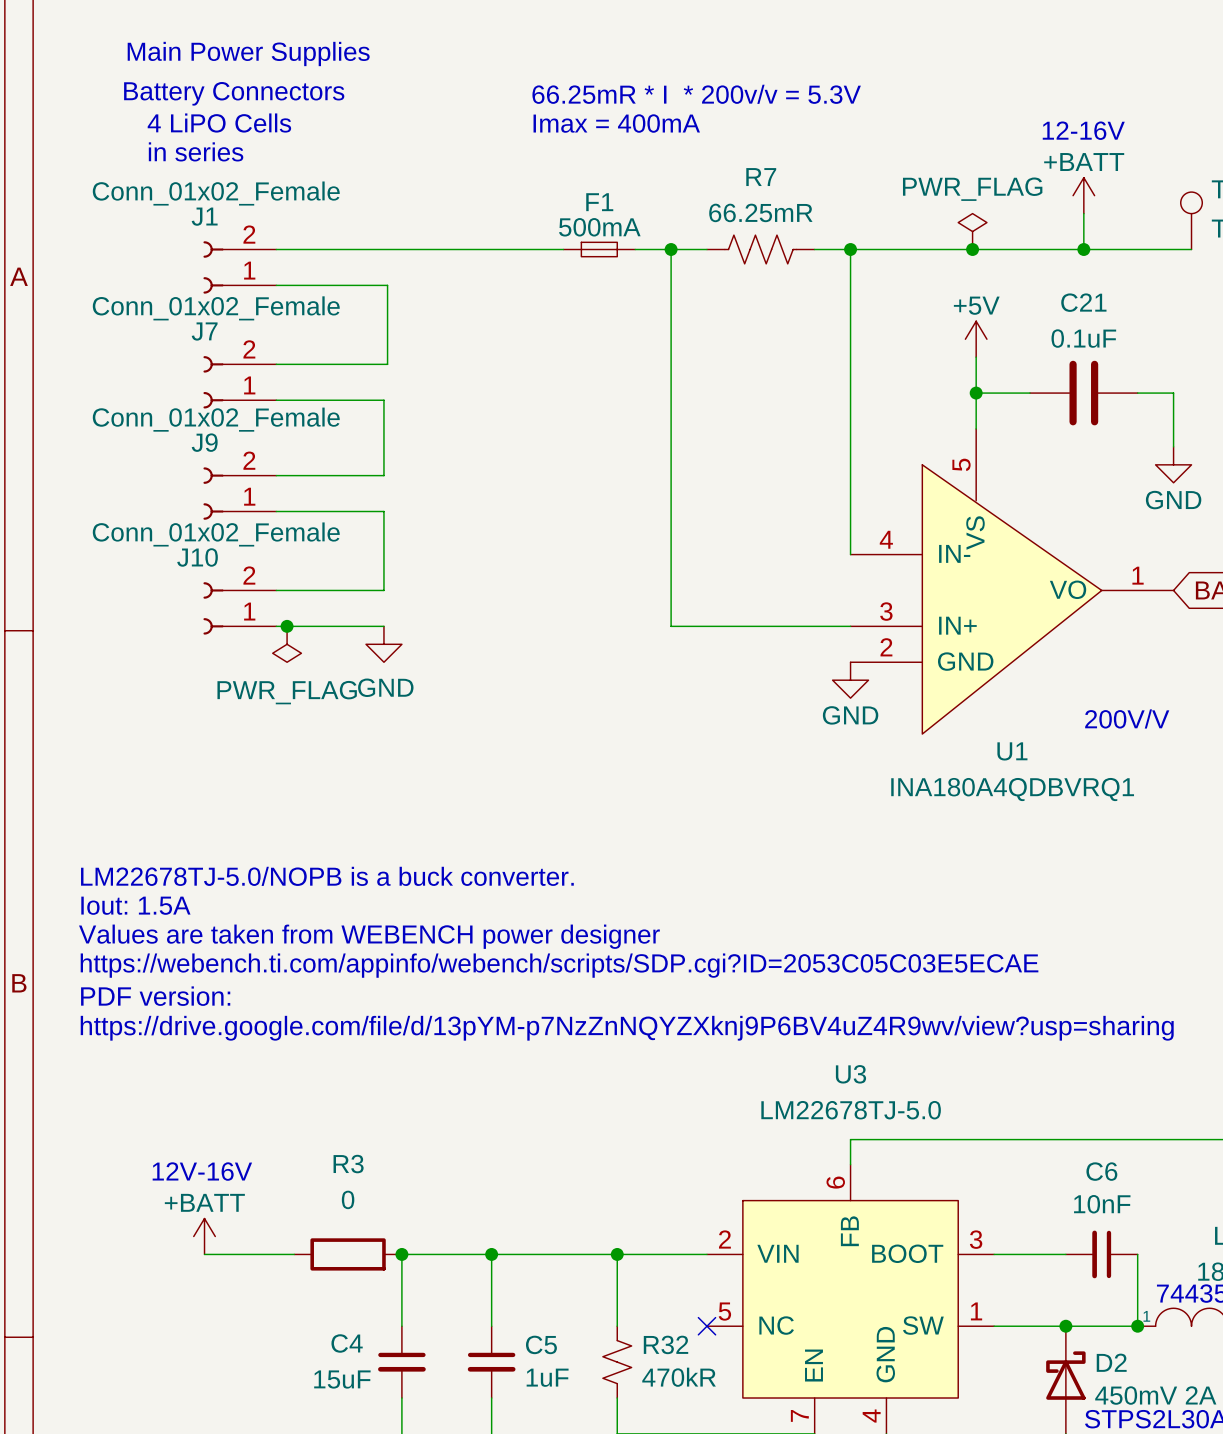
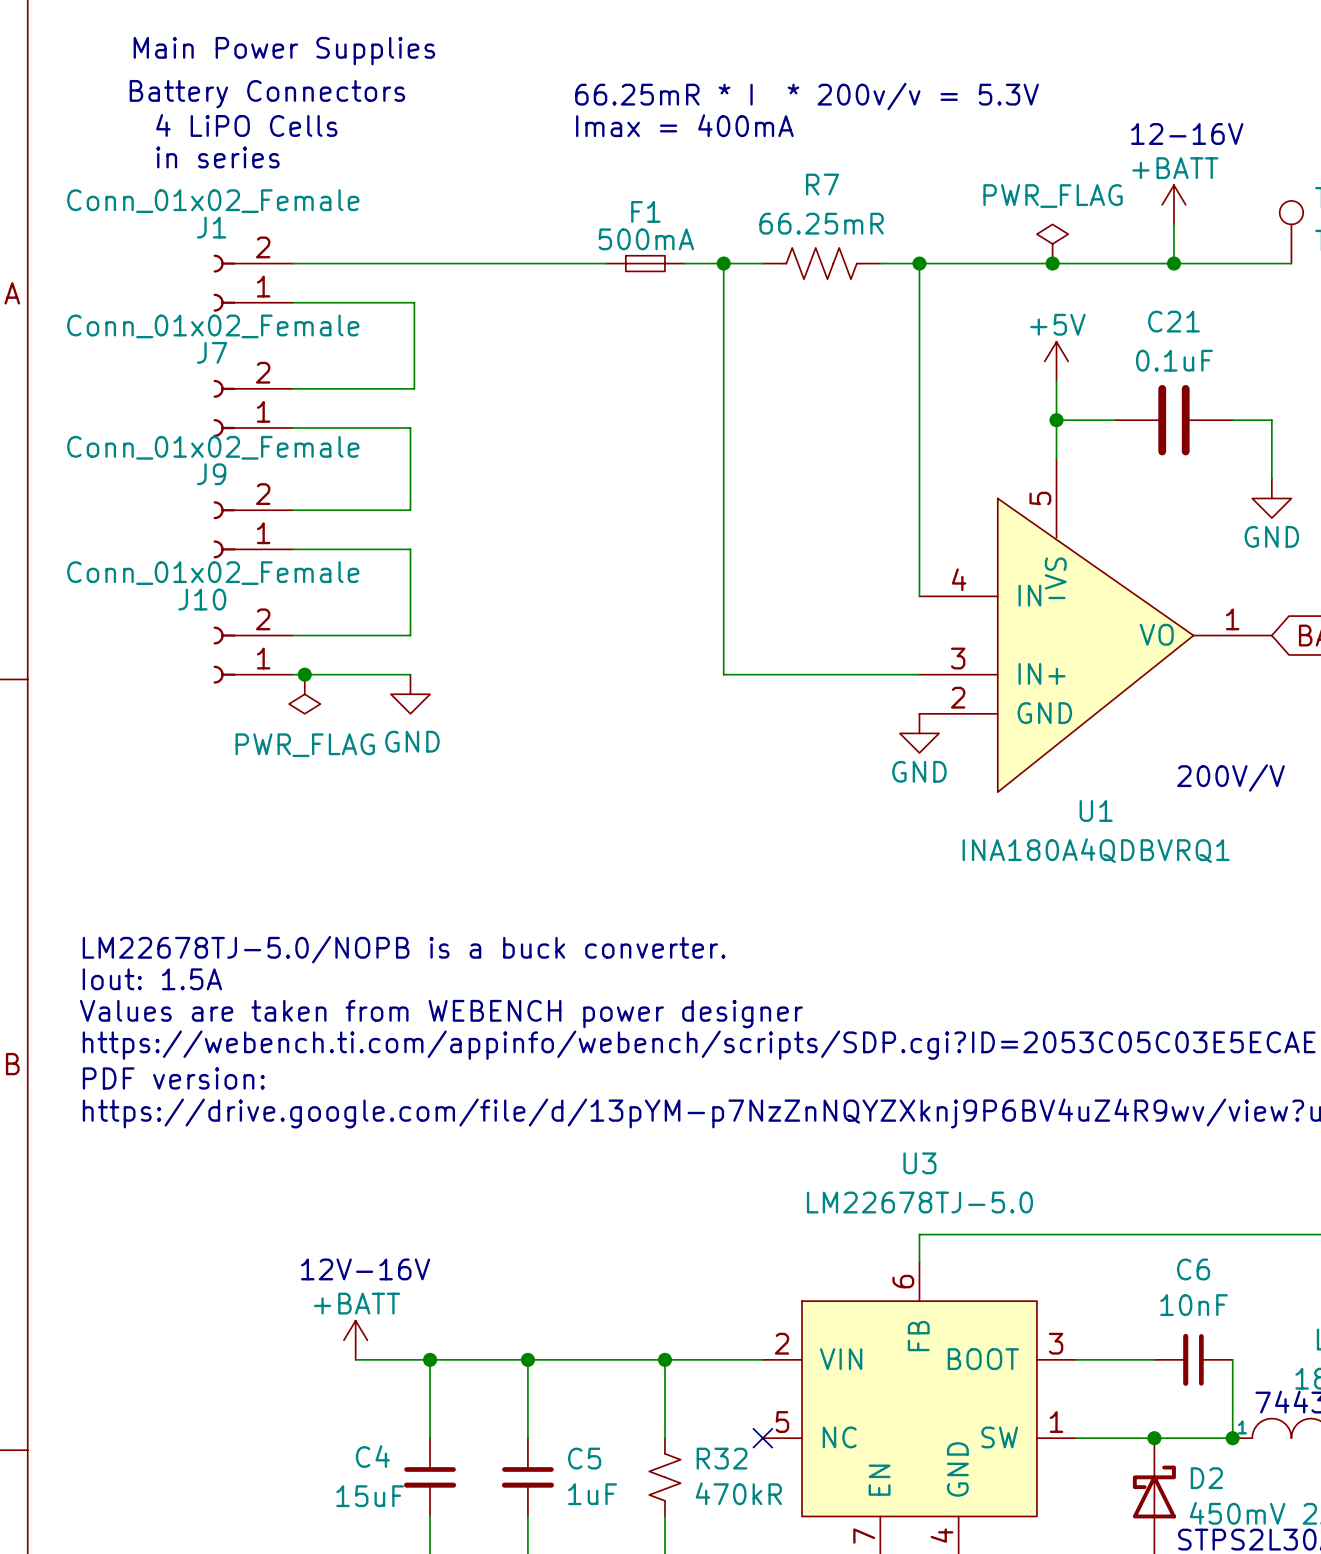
text position: 12V-16V (202, 1171) -> 12V-16V (365, 1269)
power symbol position: +BATT (204, 1236) -> +BATT (355, 1340)
wire: (204, 1254) (294, 1254) -> none
wire: none -> (355, 1359) (430, 1359)
R3: 0 (348, 1254) -> none

